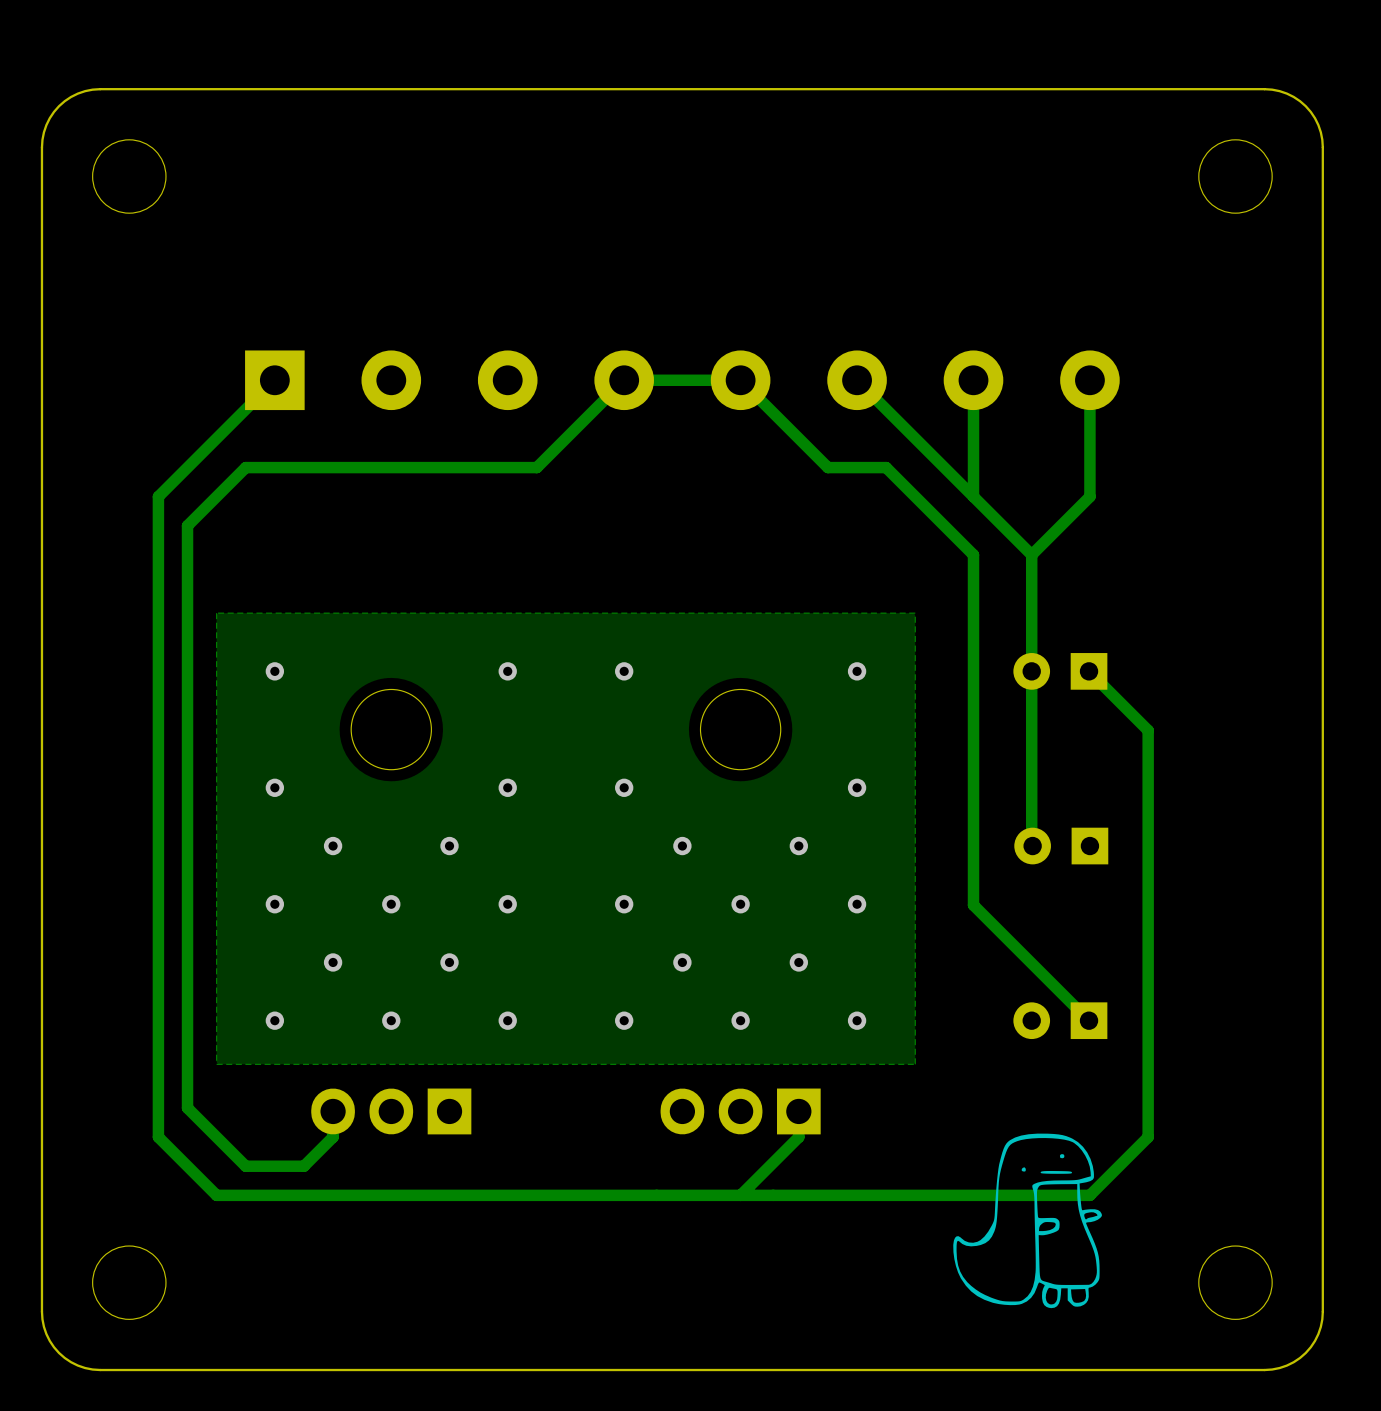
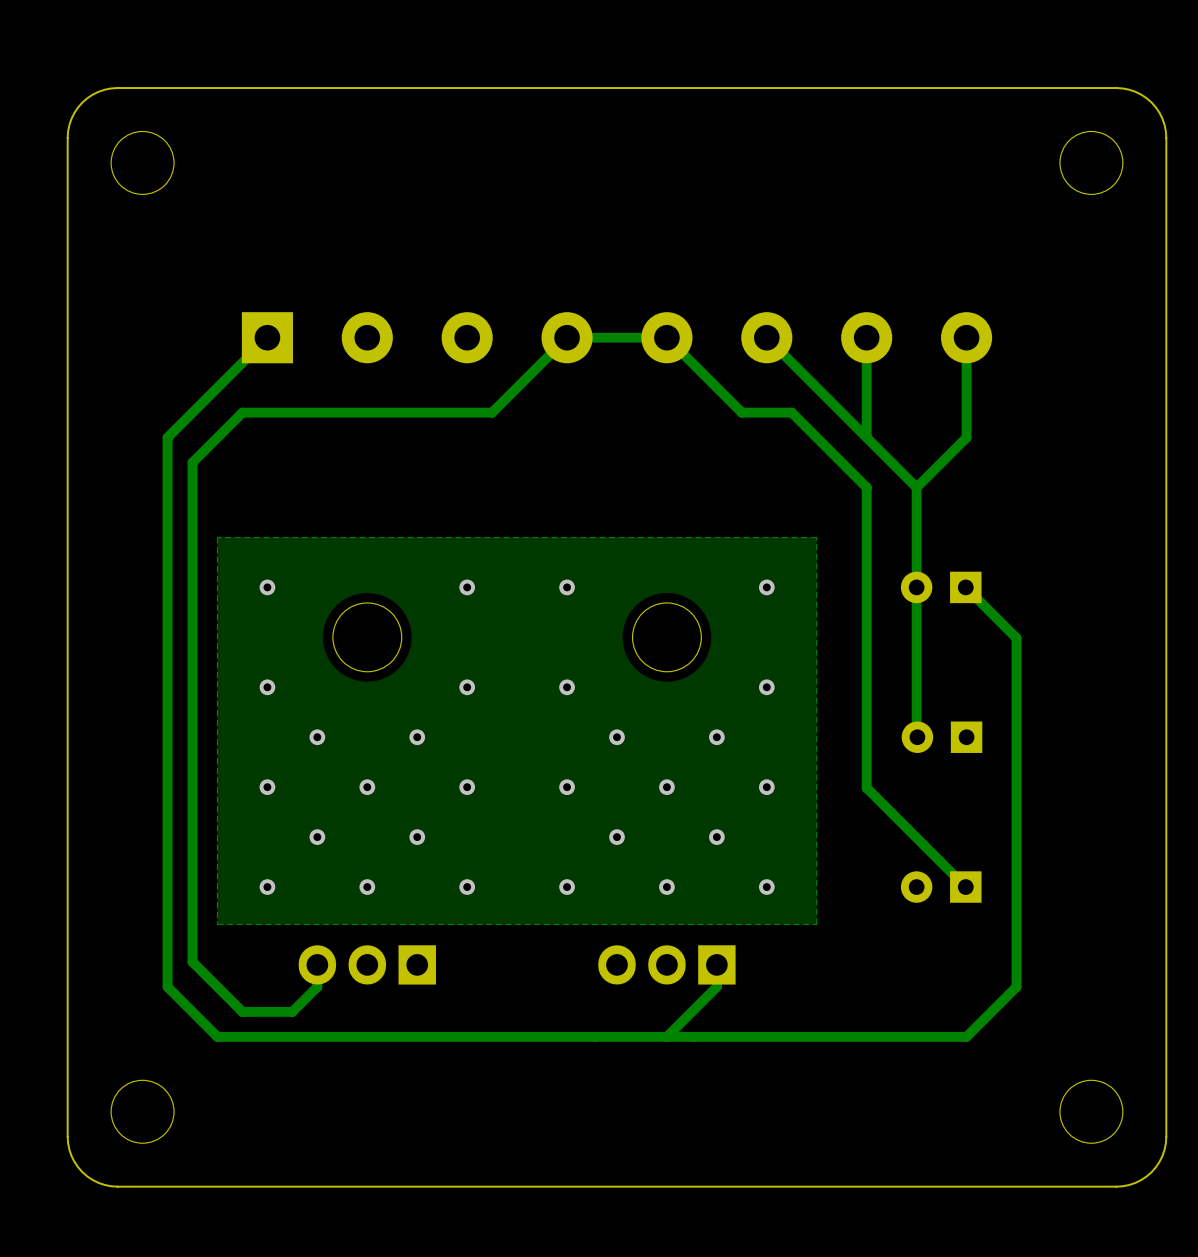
drawing: [953, 1133, 1102, 1309] -> none

